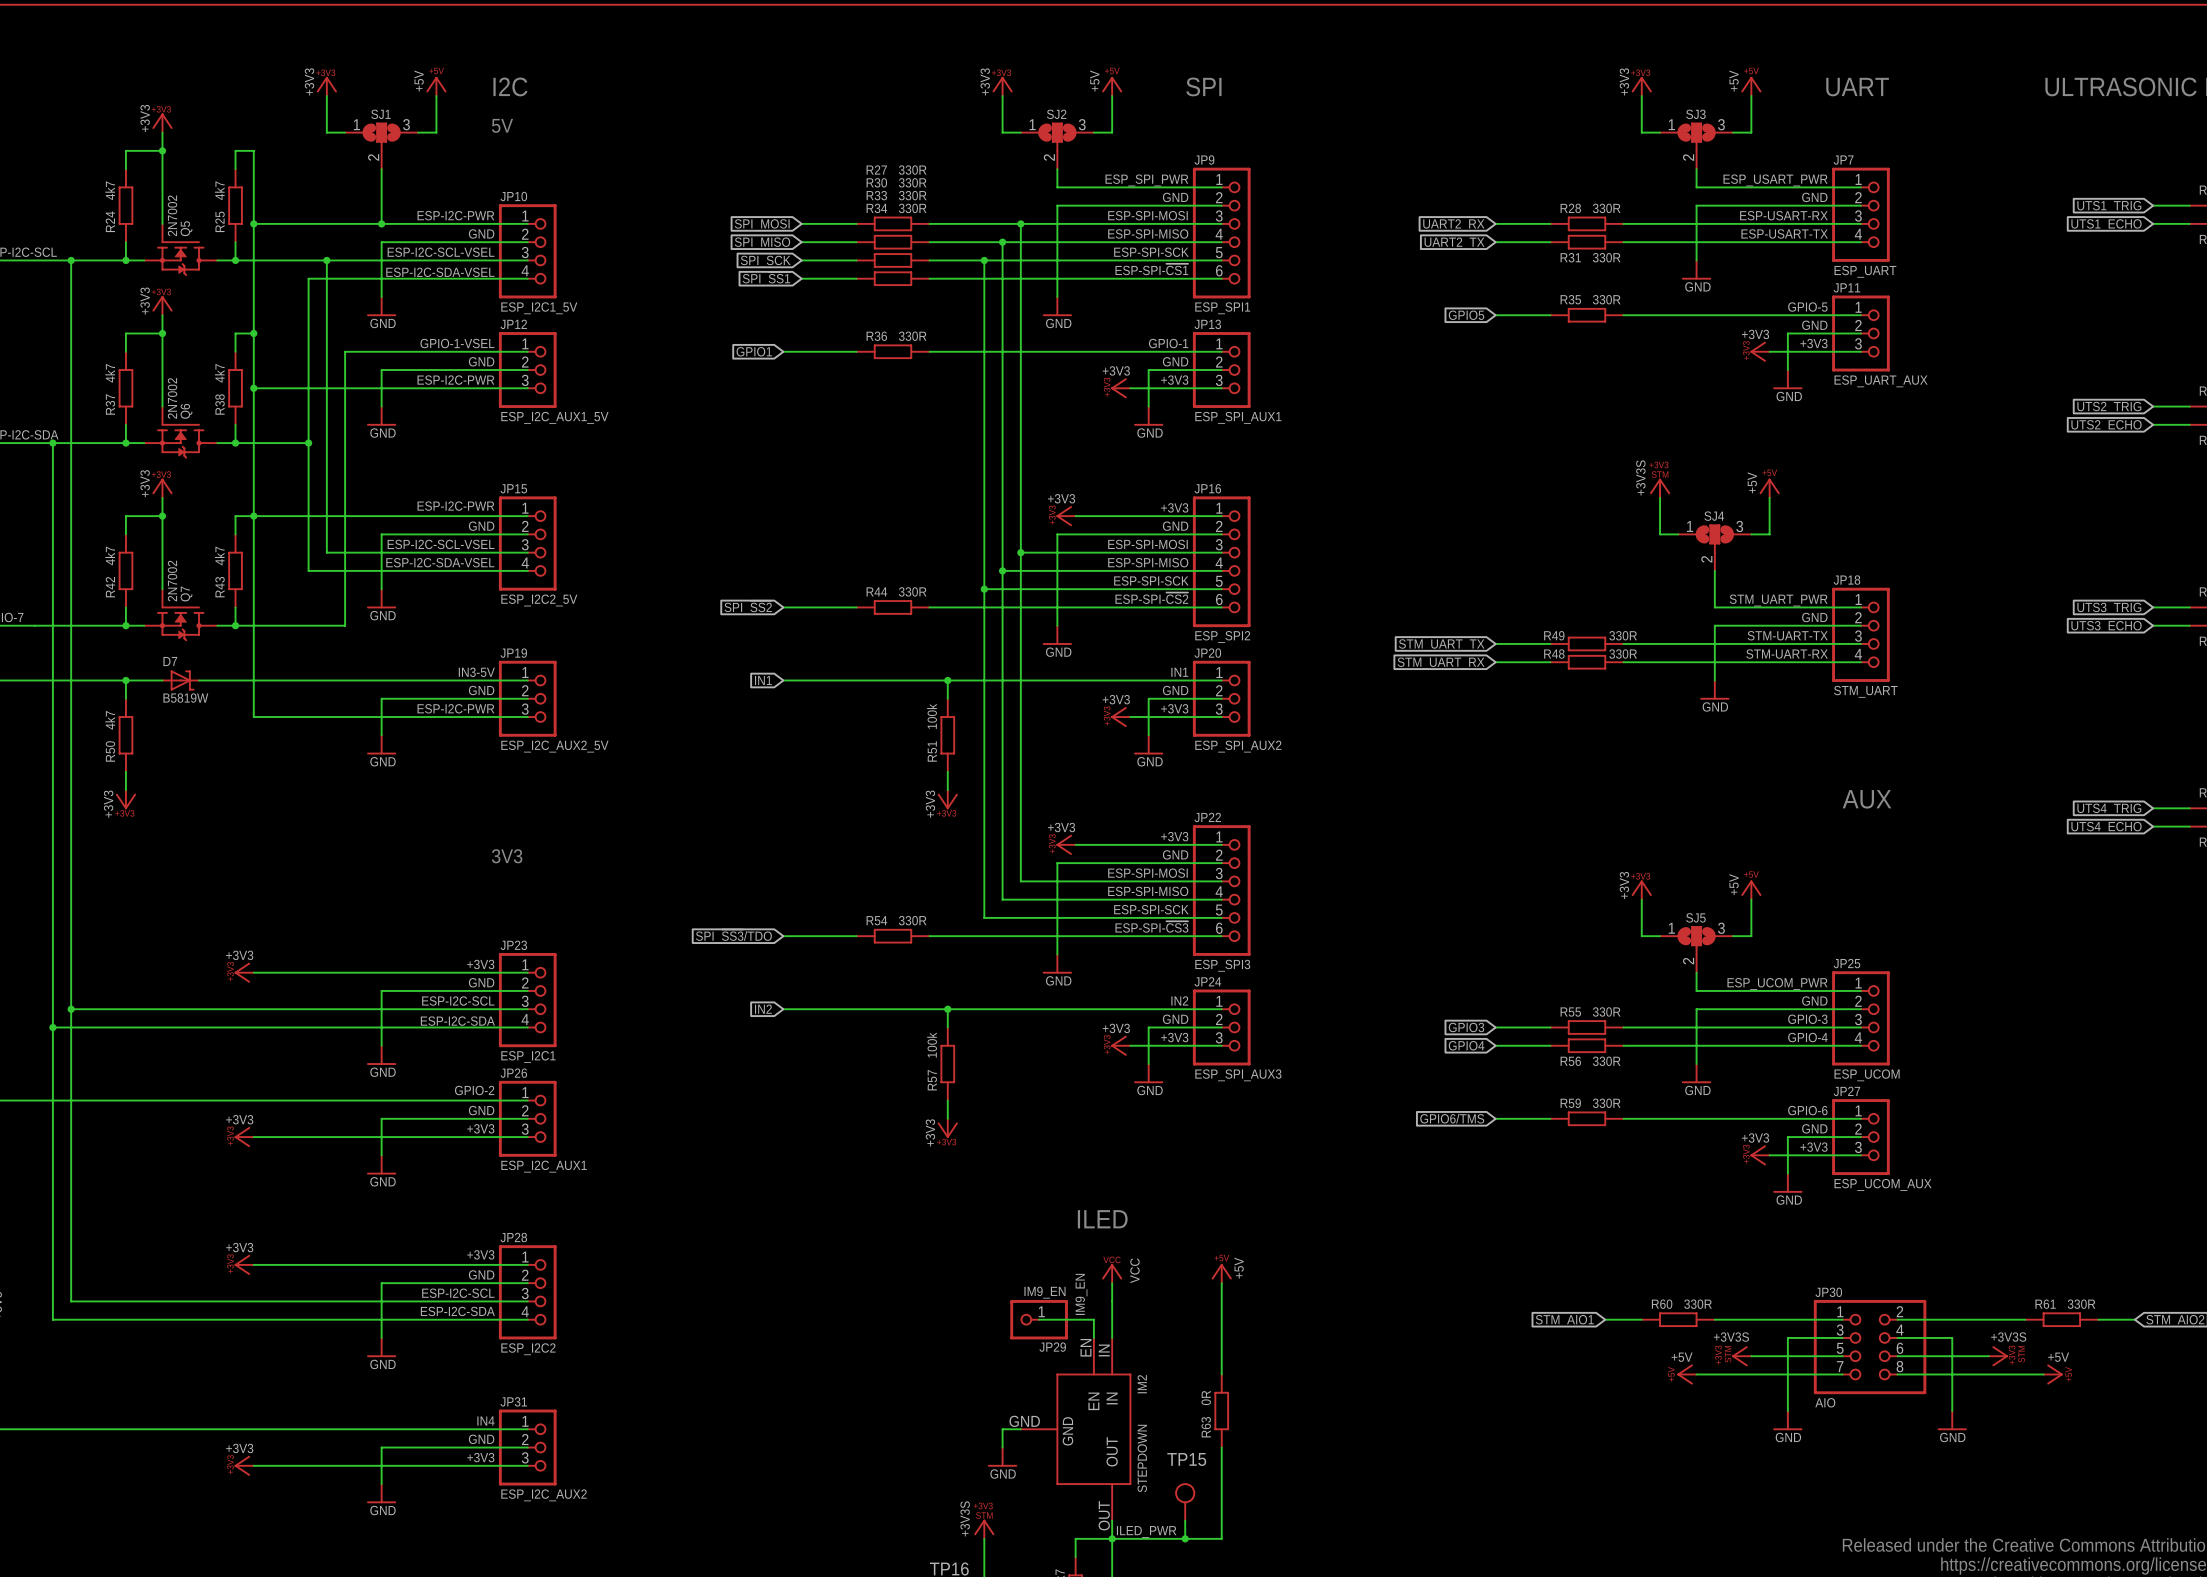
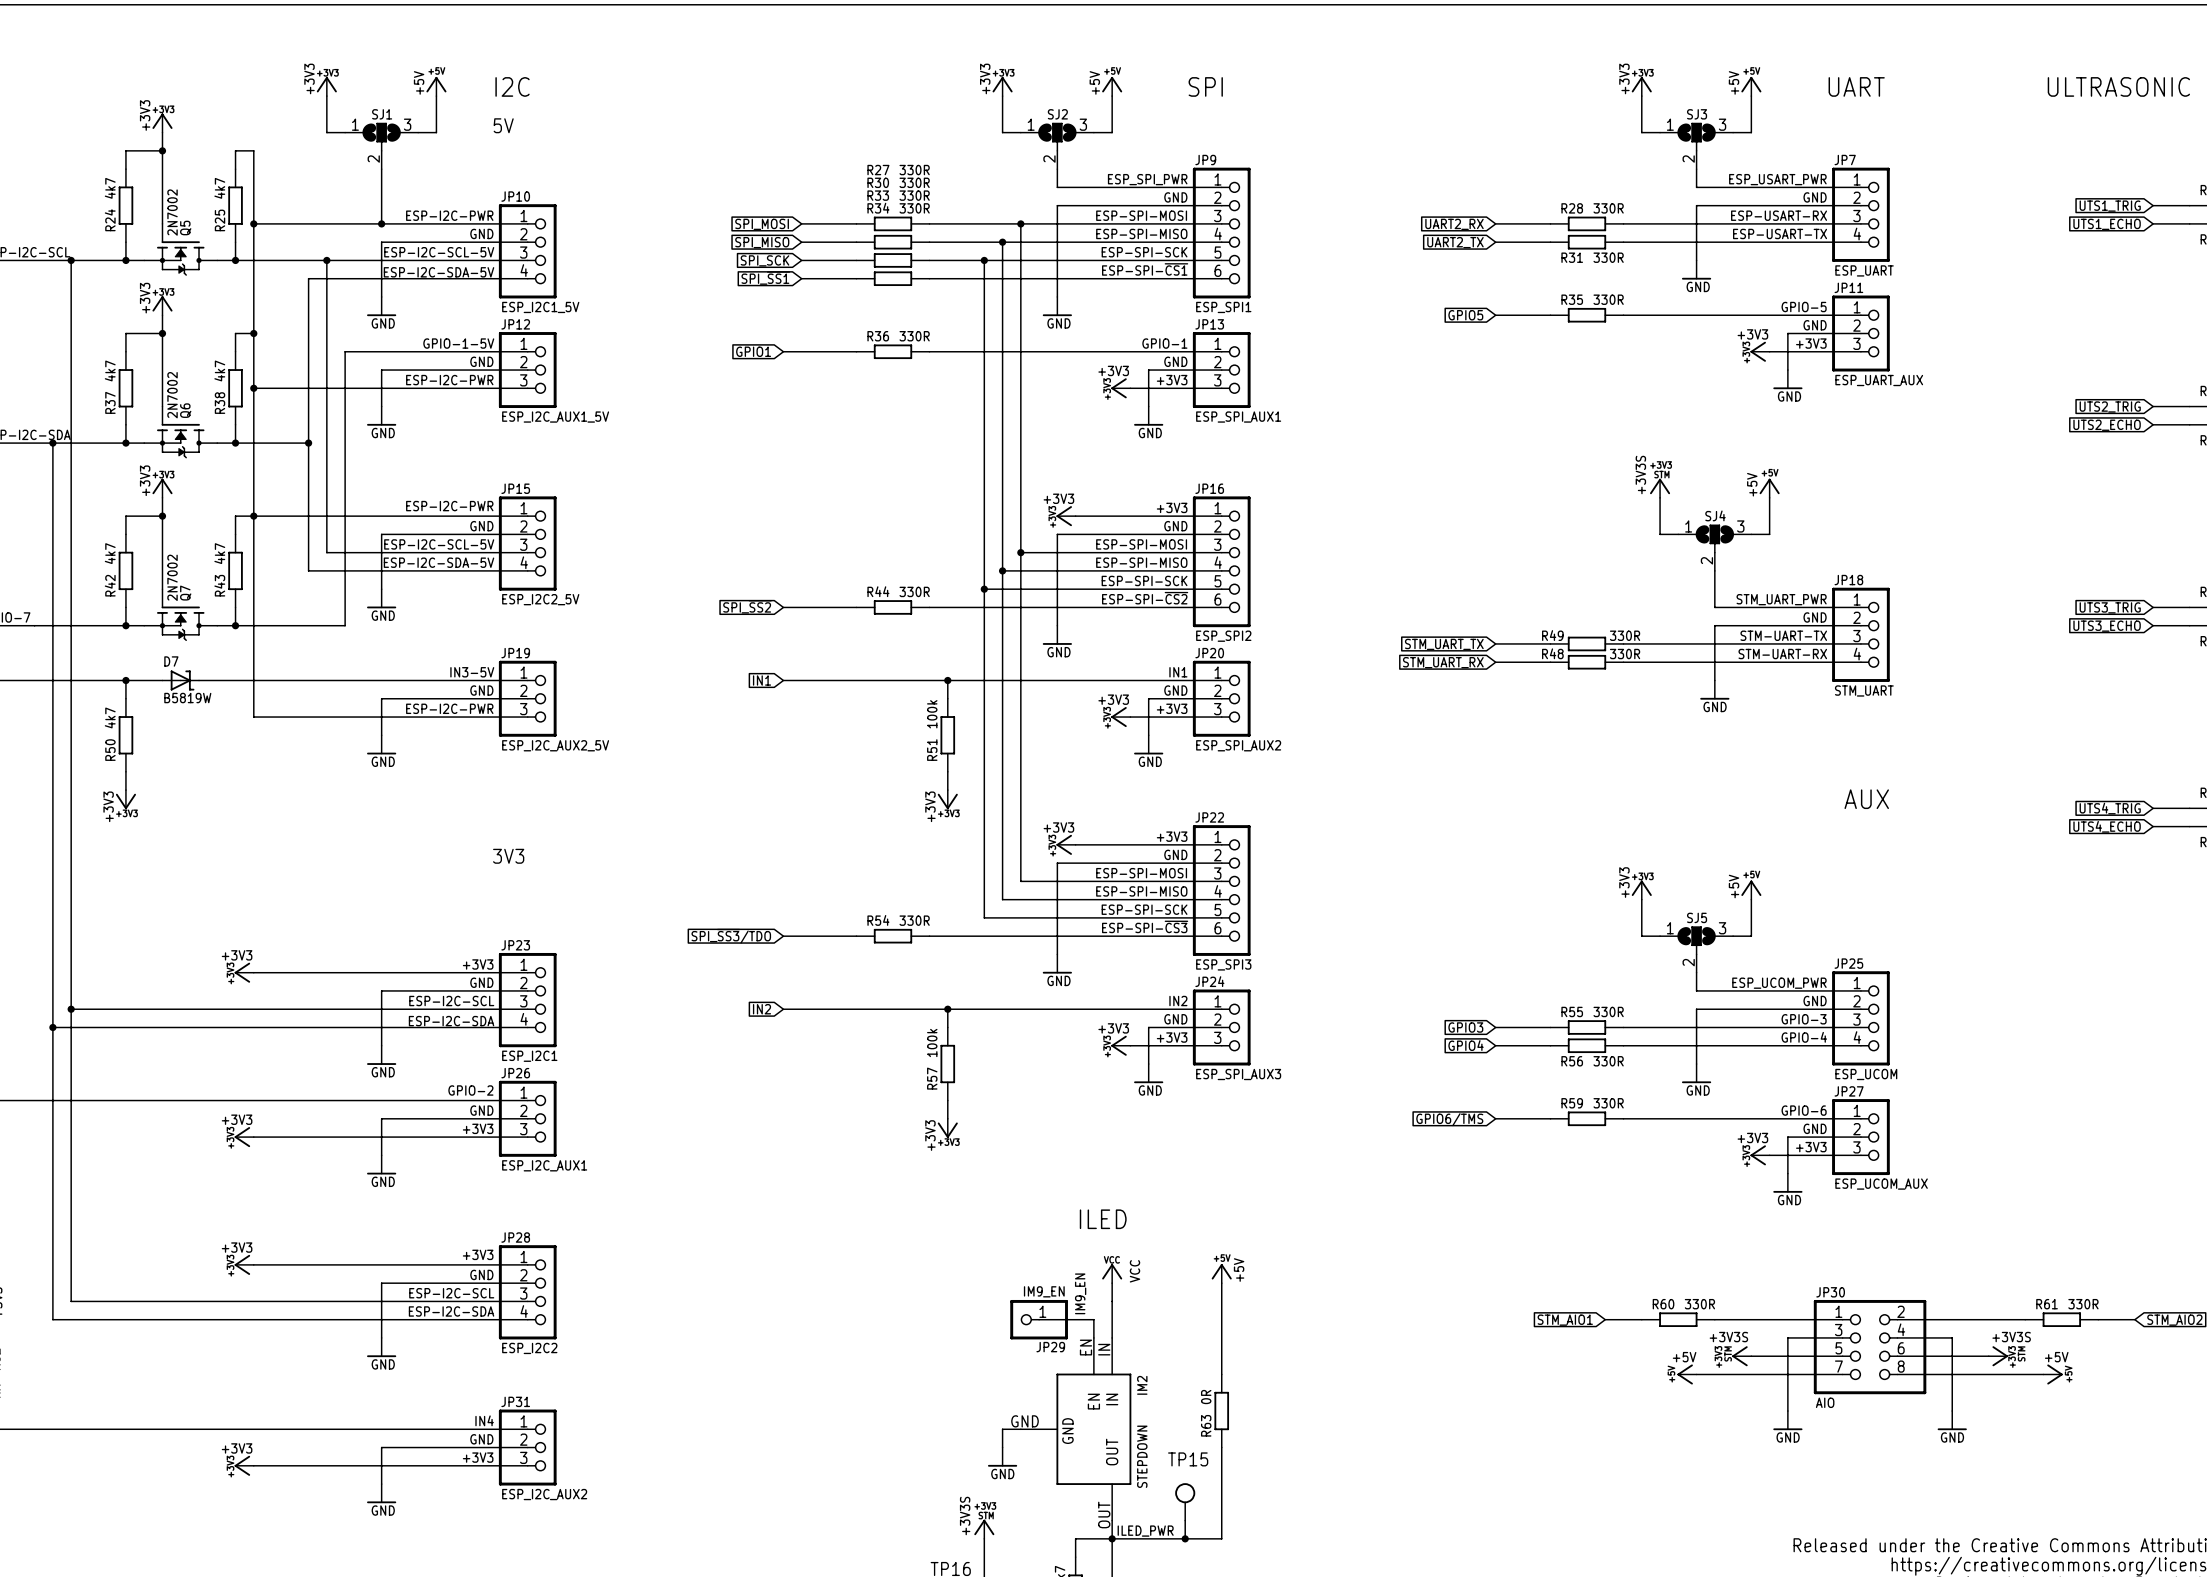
label: ESP-I2C-SCL-VSEL (441, 252) -> ESP-I2C-SCL-5V (439, 252)
label: ESP-I2C-SDA-VSEL (440, 272) -> ESP-I2C-SDA-5V (439, 272)
label: GPIO-1-VSEL (457, 343) -> GPIO-1-5V (458, 343)
label: ESP-I2C-SCL-VSEL (441, 544) -> ESP-I2C-SCL-5V (439, 544)
label: ESP-I2C-SDA-VSEL (440, 562) -> ESP-I2C-SDA-5V (439, 562)

